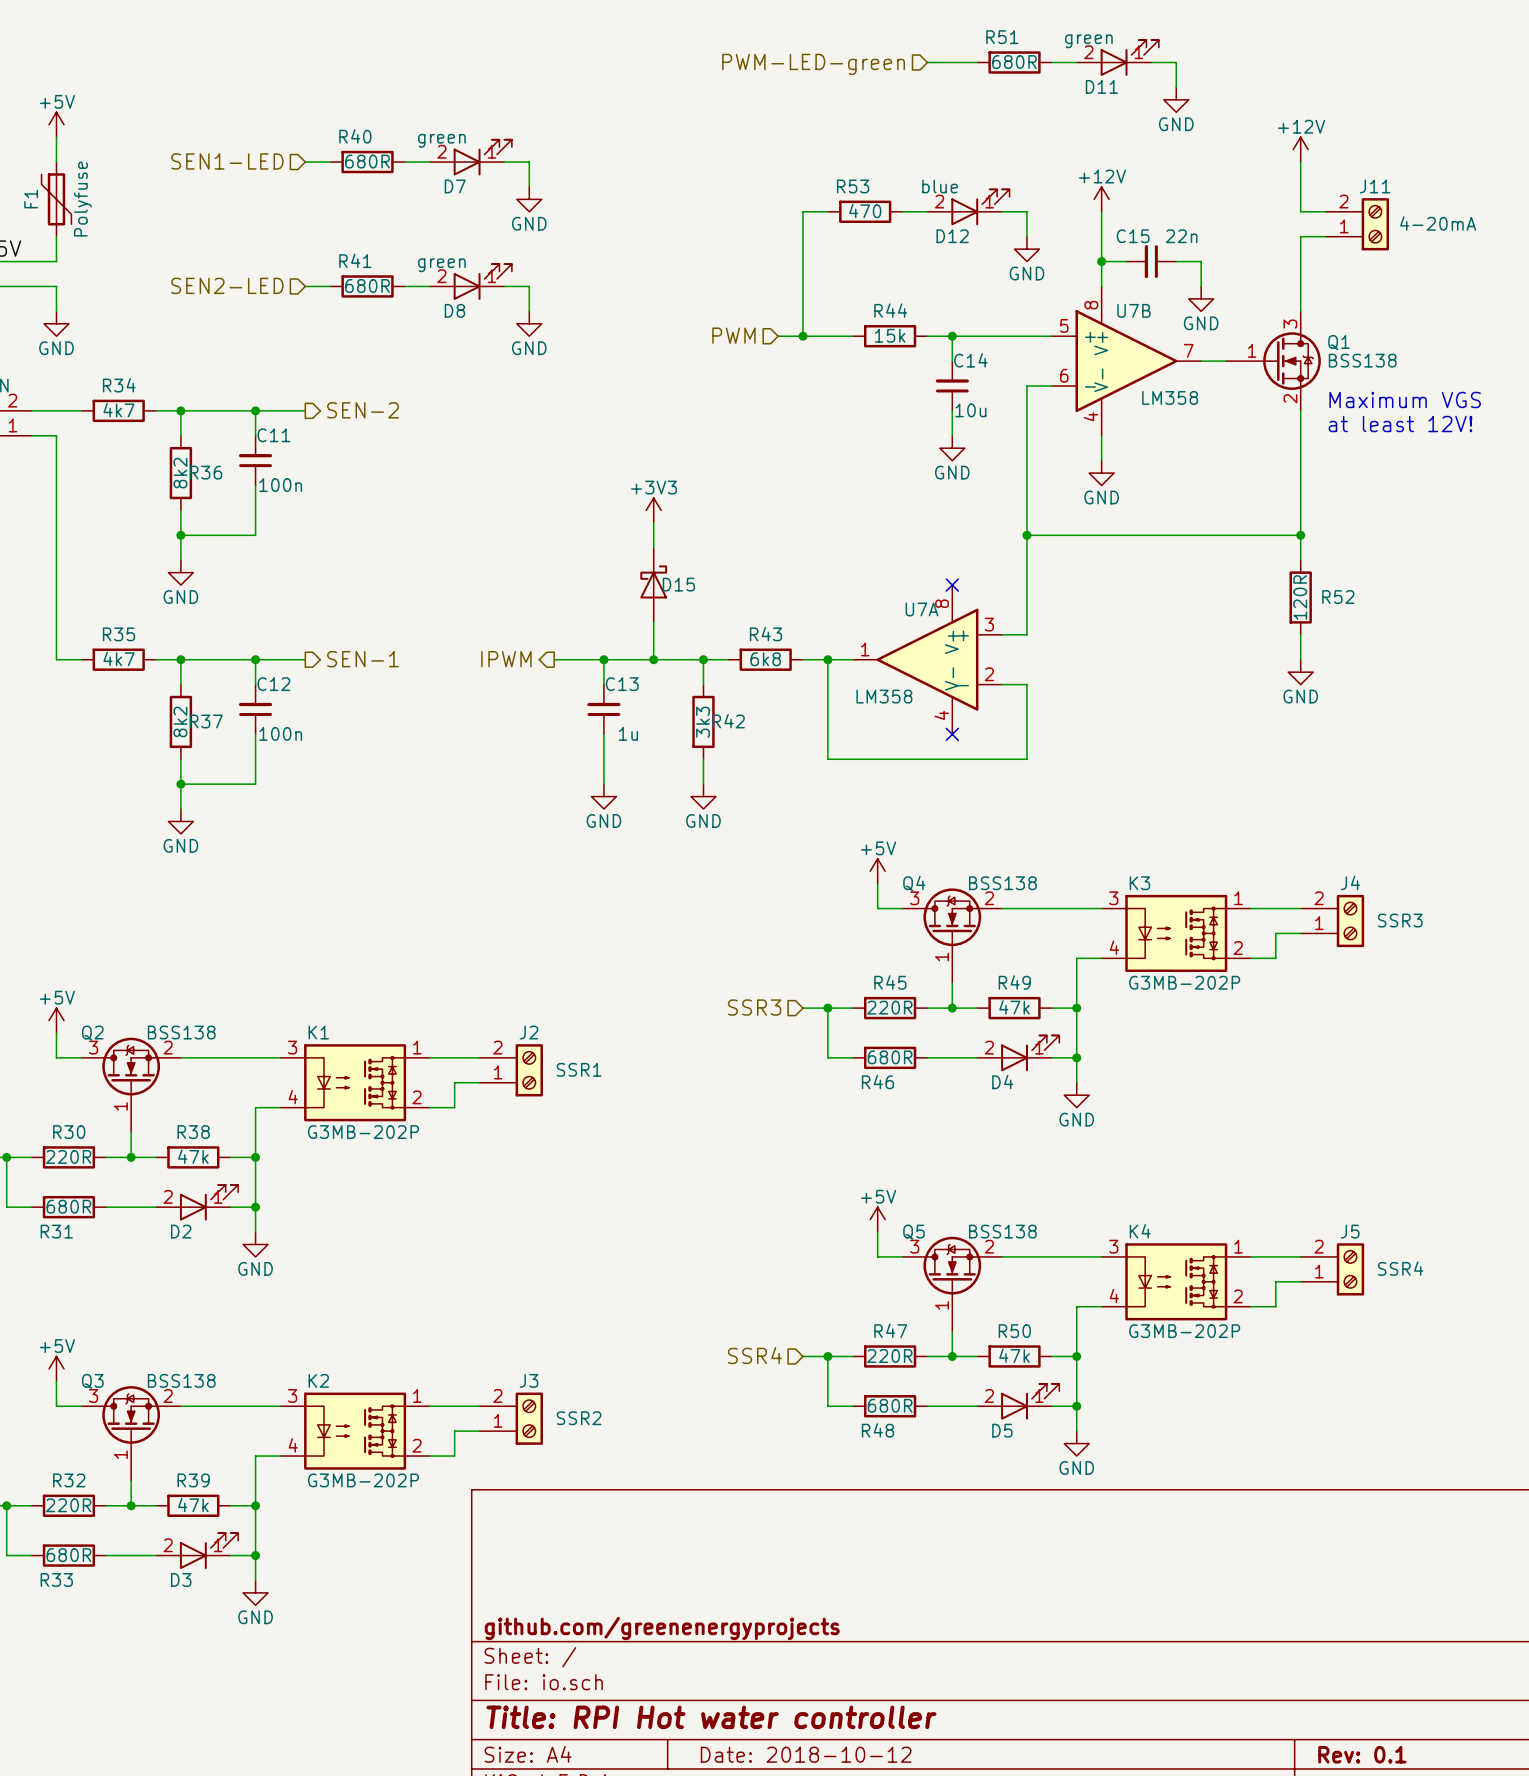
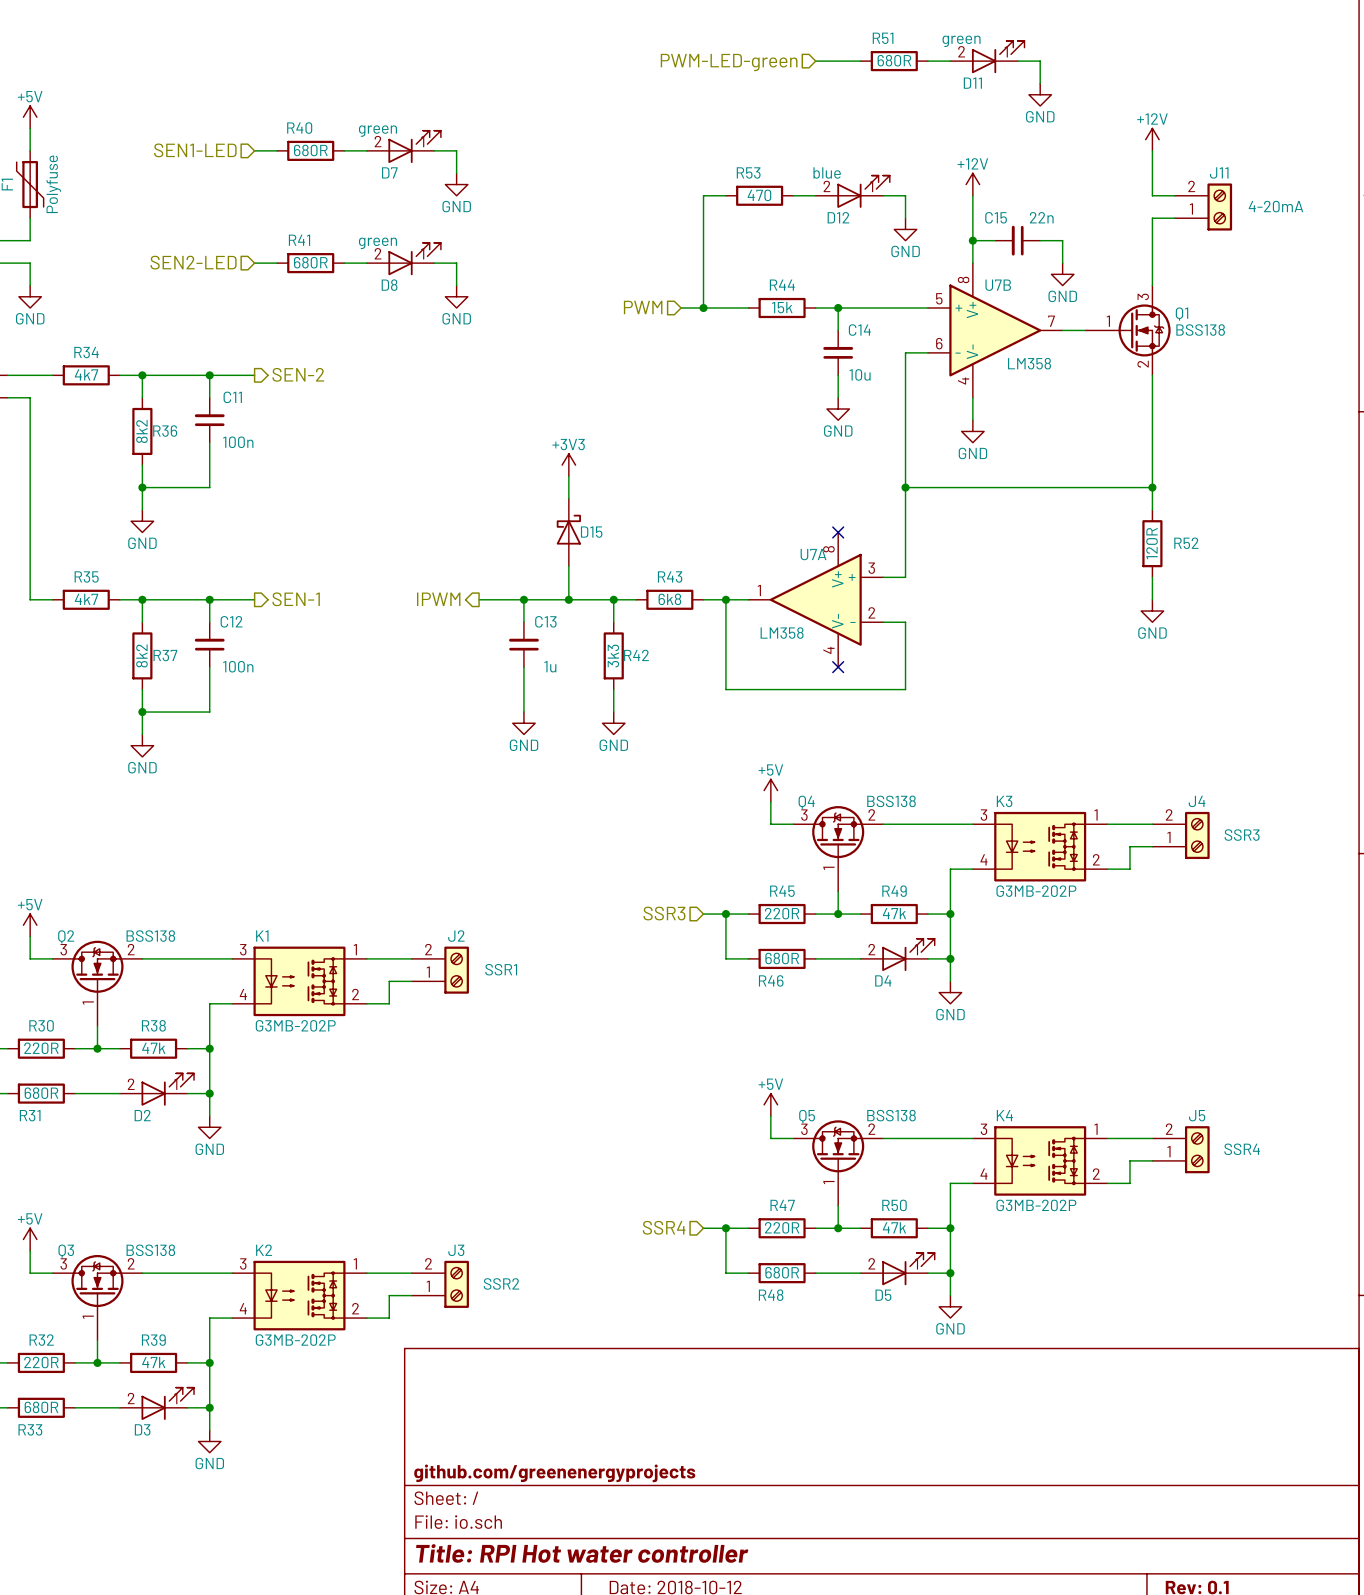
text: Maximum VGS (1405, 399) -> none
text: at least 12V! (1400, 424) -> none

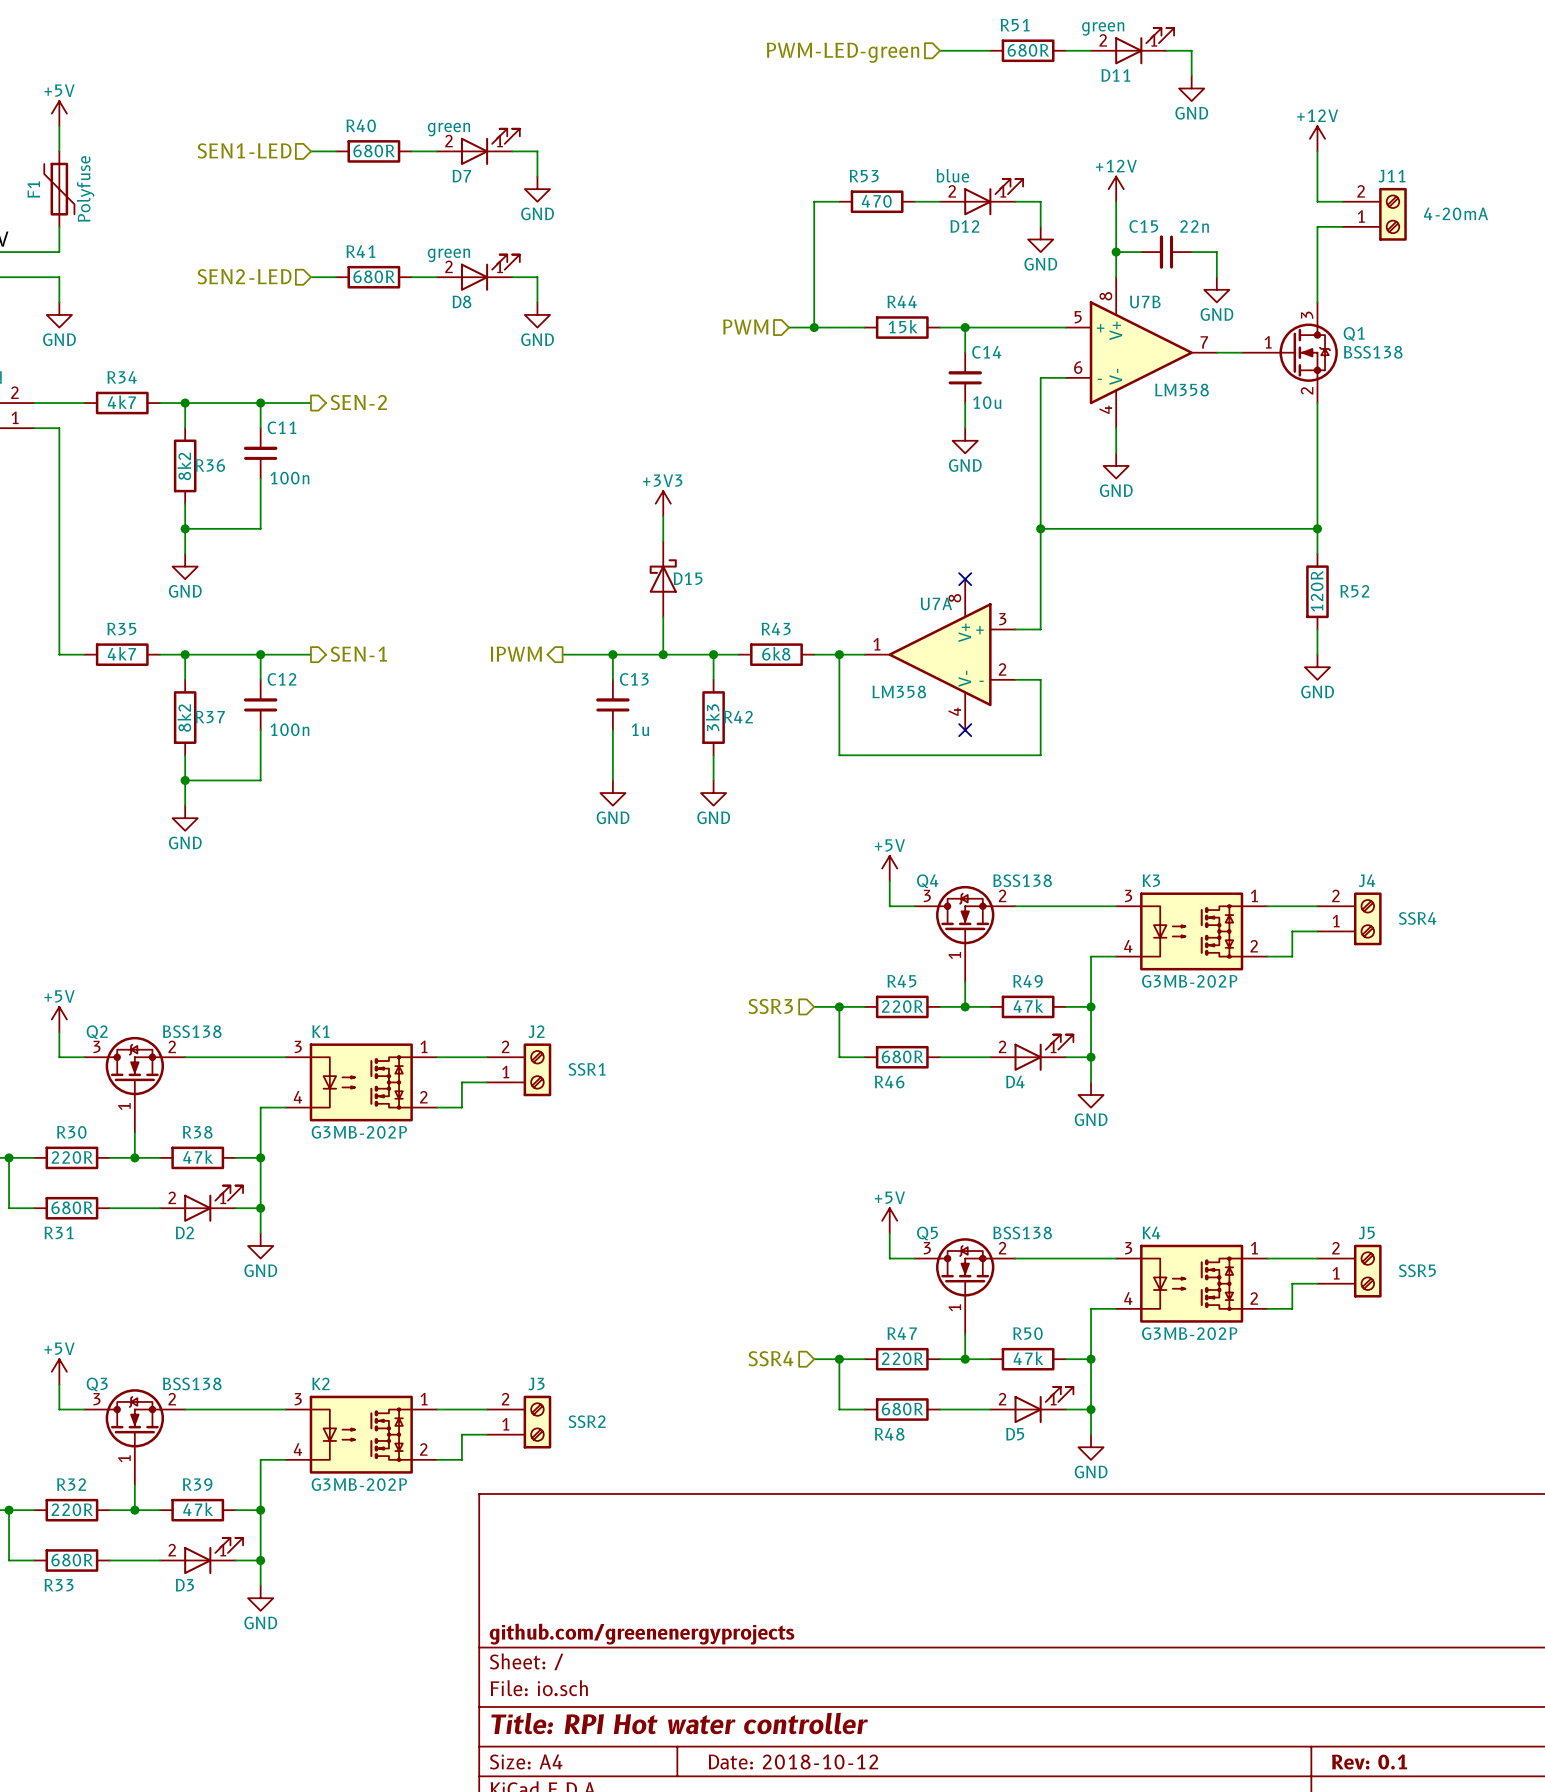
J4 value: SSR3 (1242, 835) -> SSR4 (1417, 918)
J5 value: SSR4 (1242, 1149) -> SSR5 (1417, 1270)

